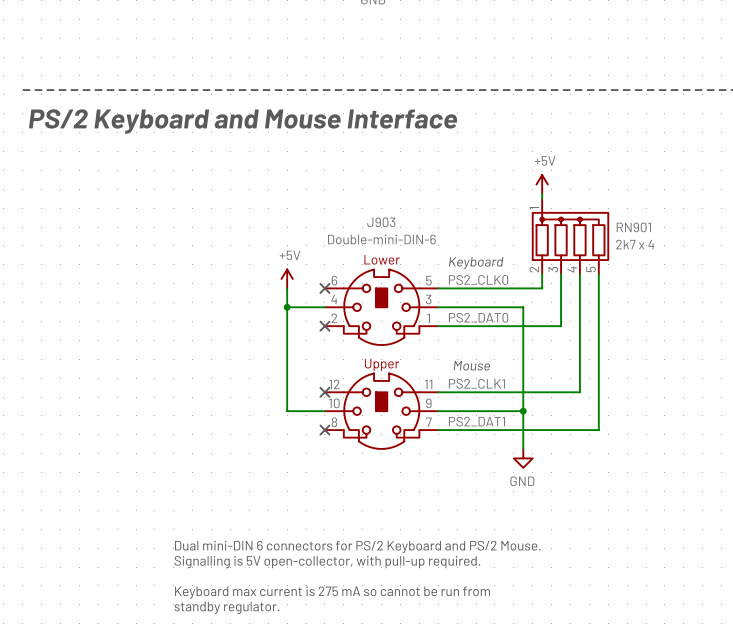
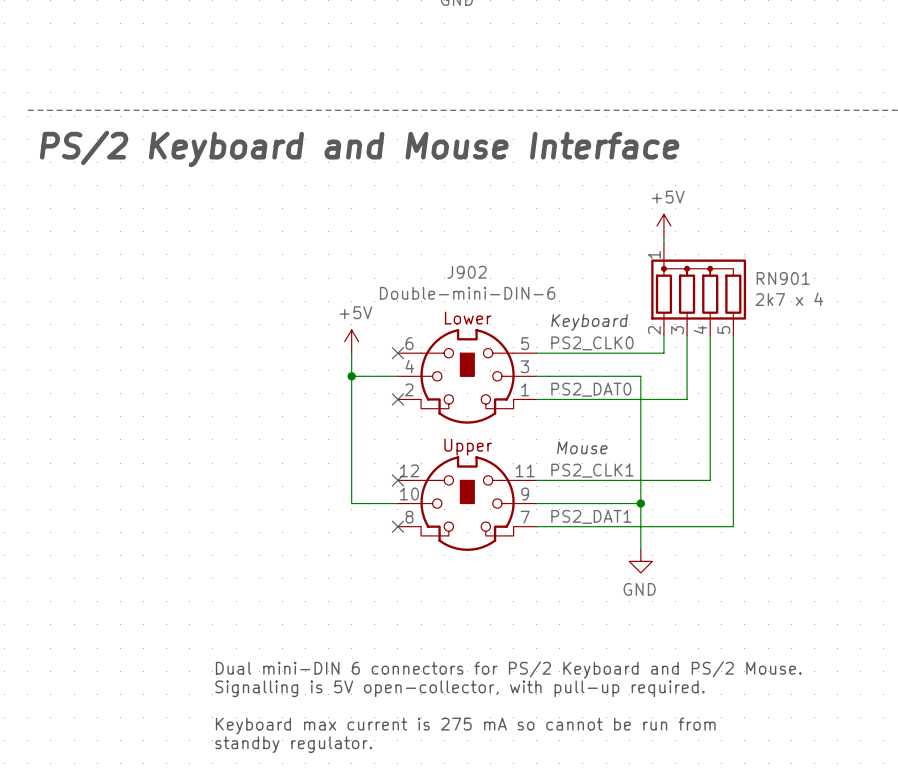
J903 name: J903 (381, 222) -> J902 (467, 272)

